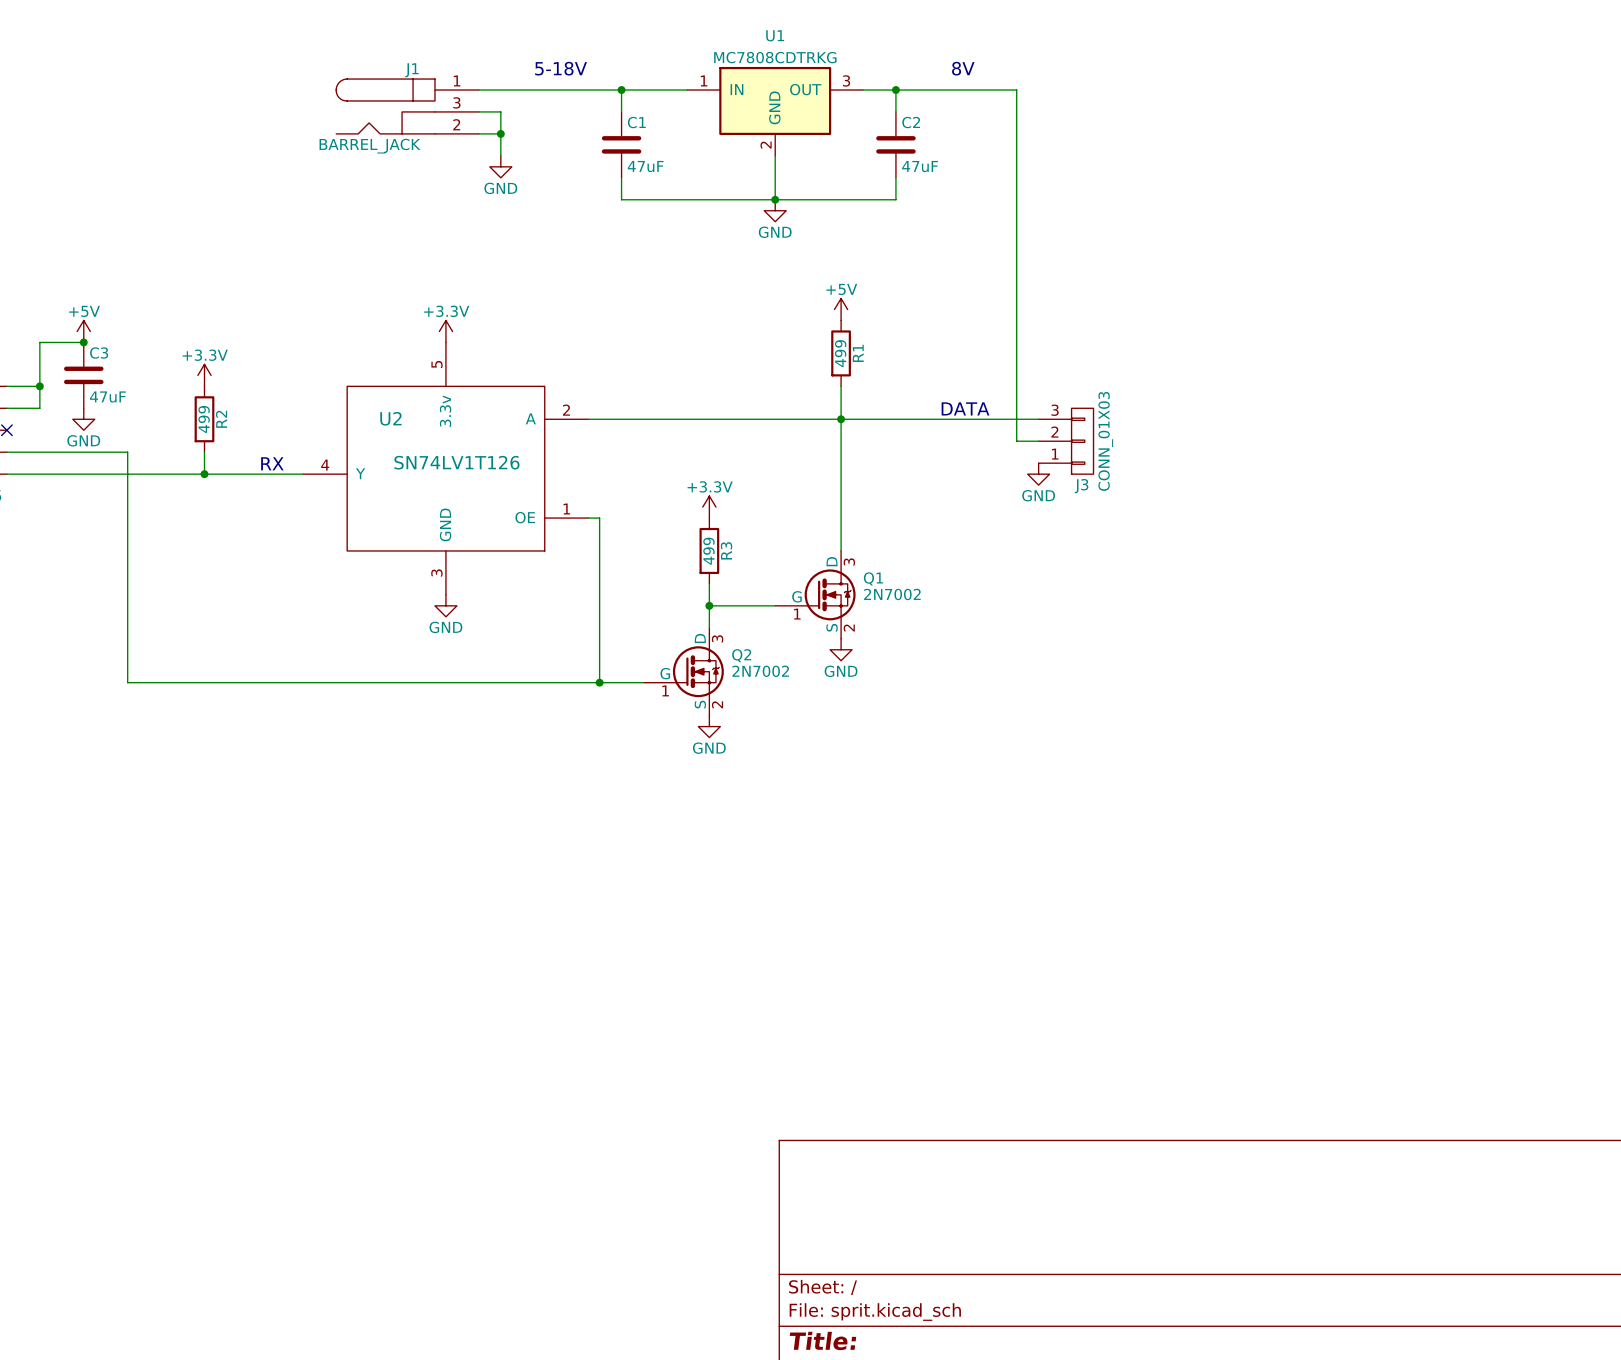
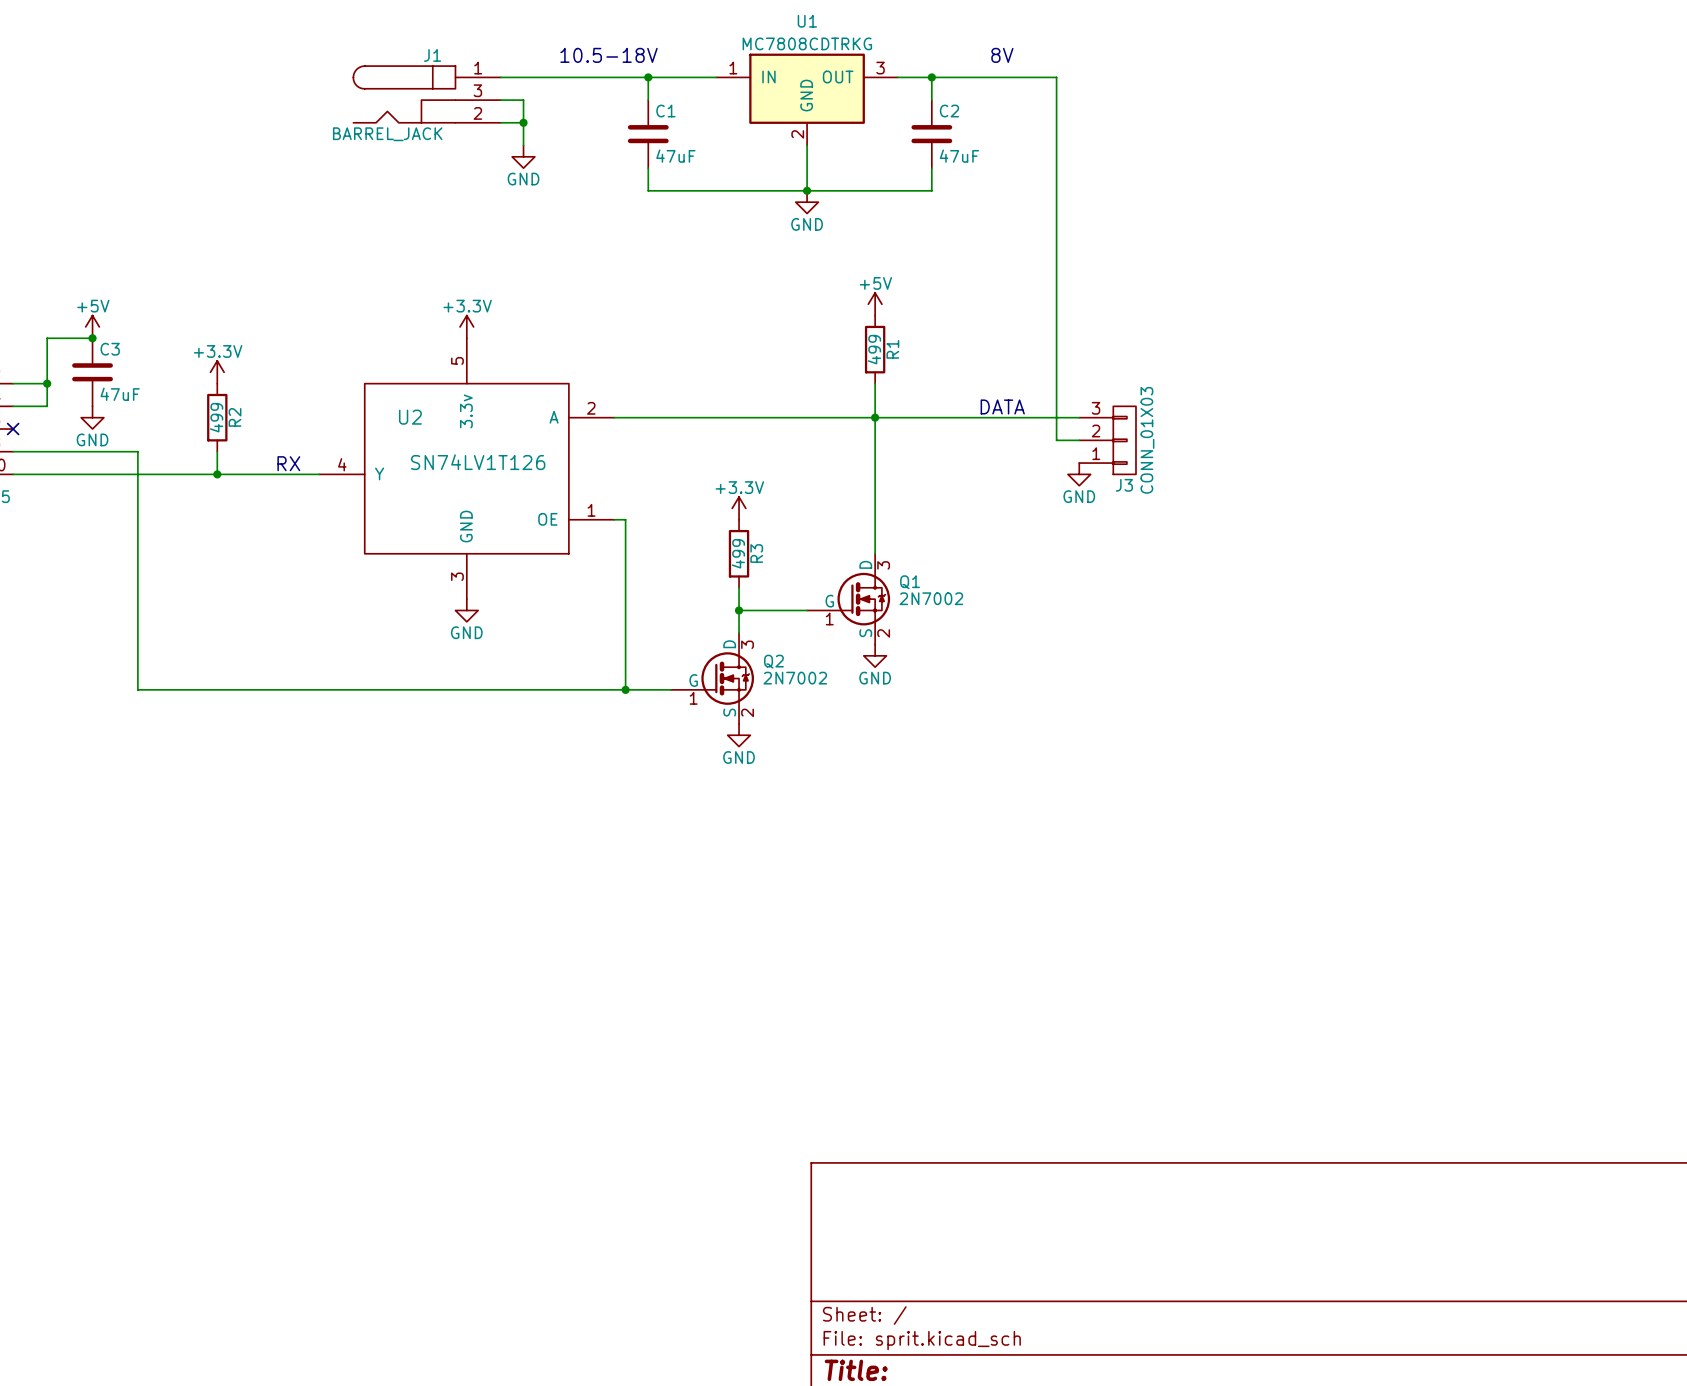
text: 5-18V (561, 68) -> 10.5-18V (609, 55)

